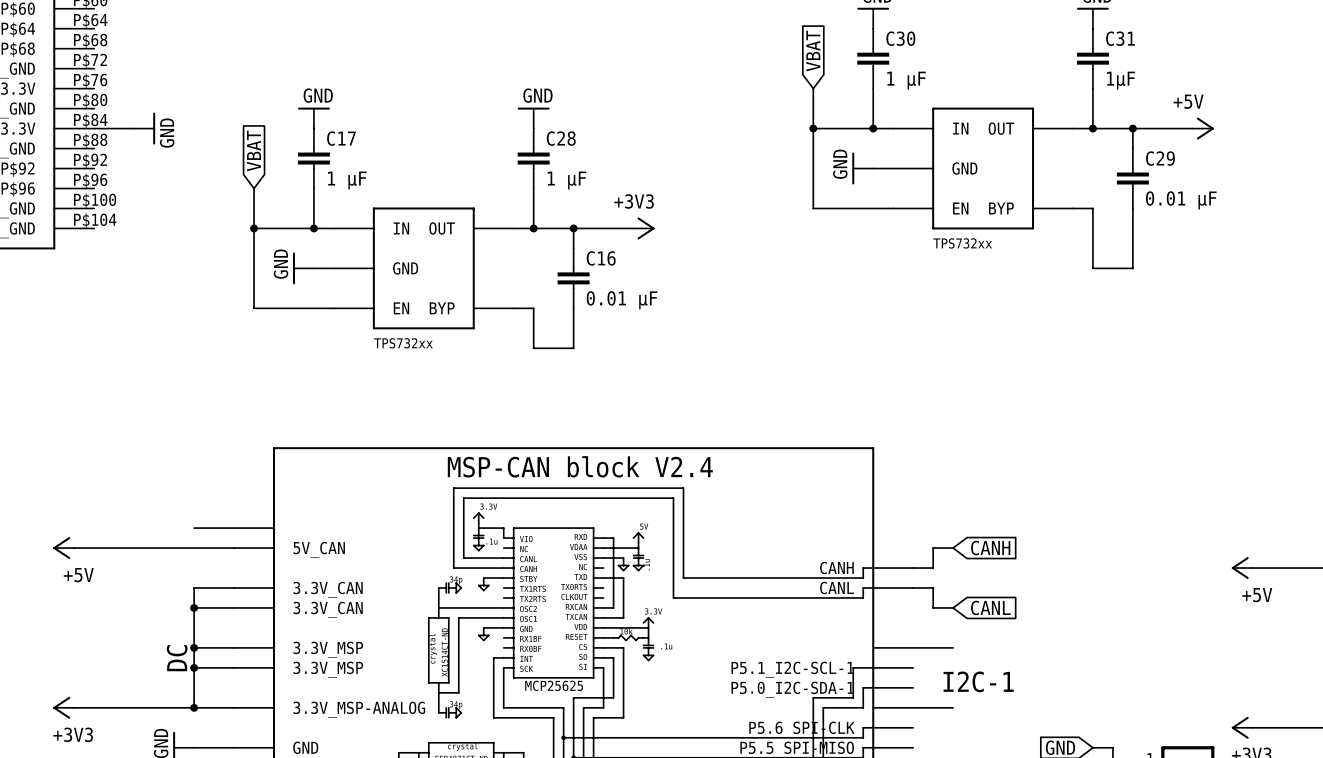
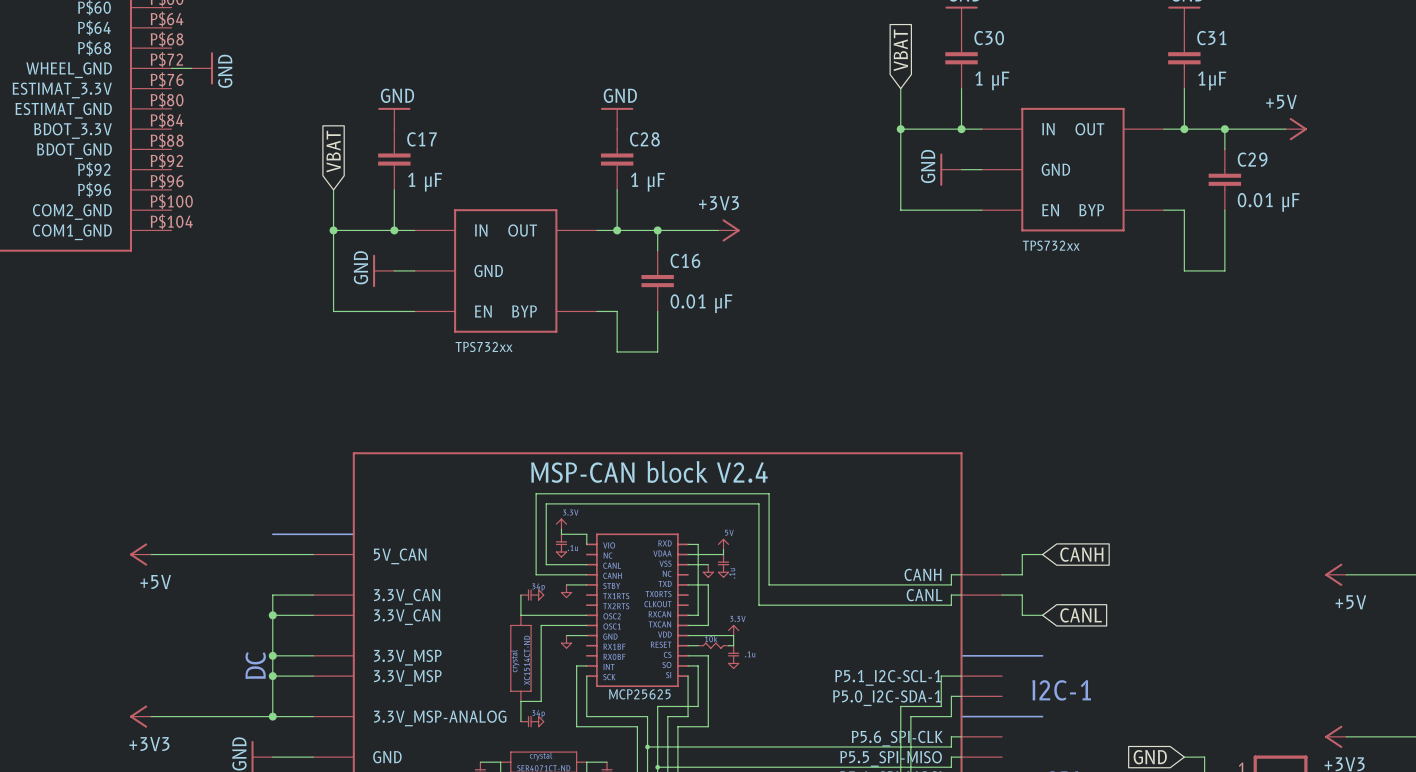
wire: none -> (171, 68) (191, 68)
wire: (94, 128) (134, 128) -> none
power symbol position: GND (144, 128) -> GND (202, 68)

